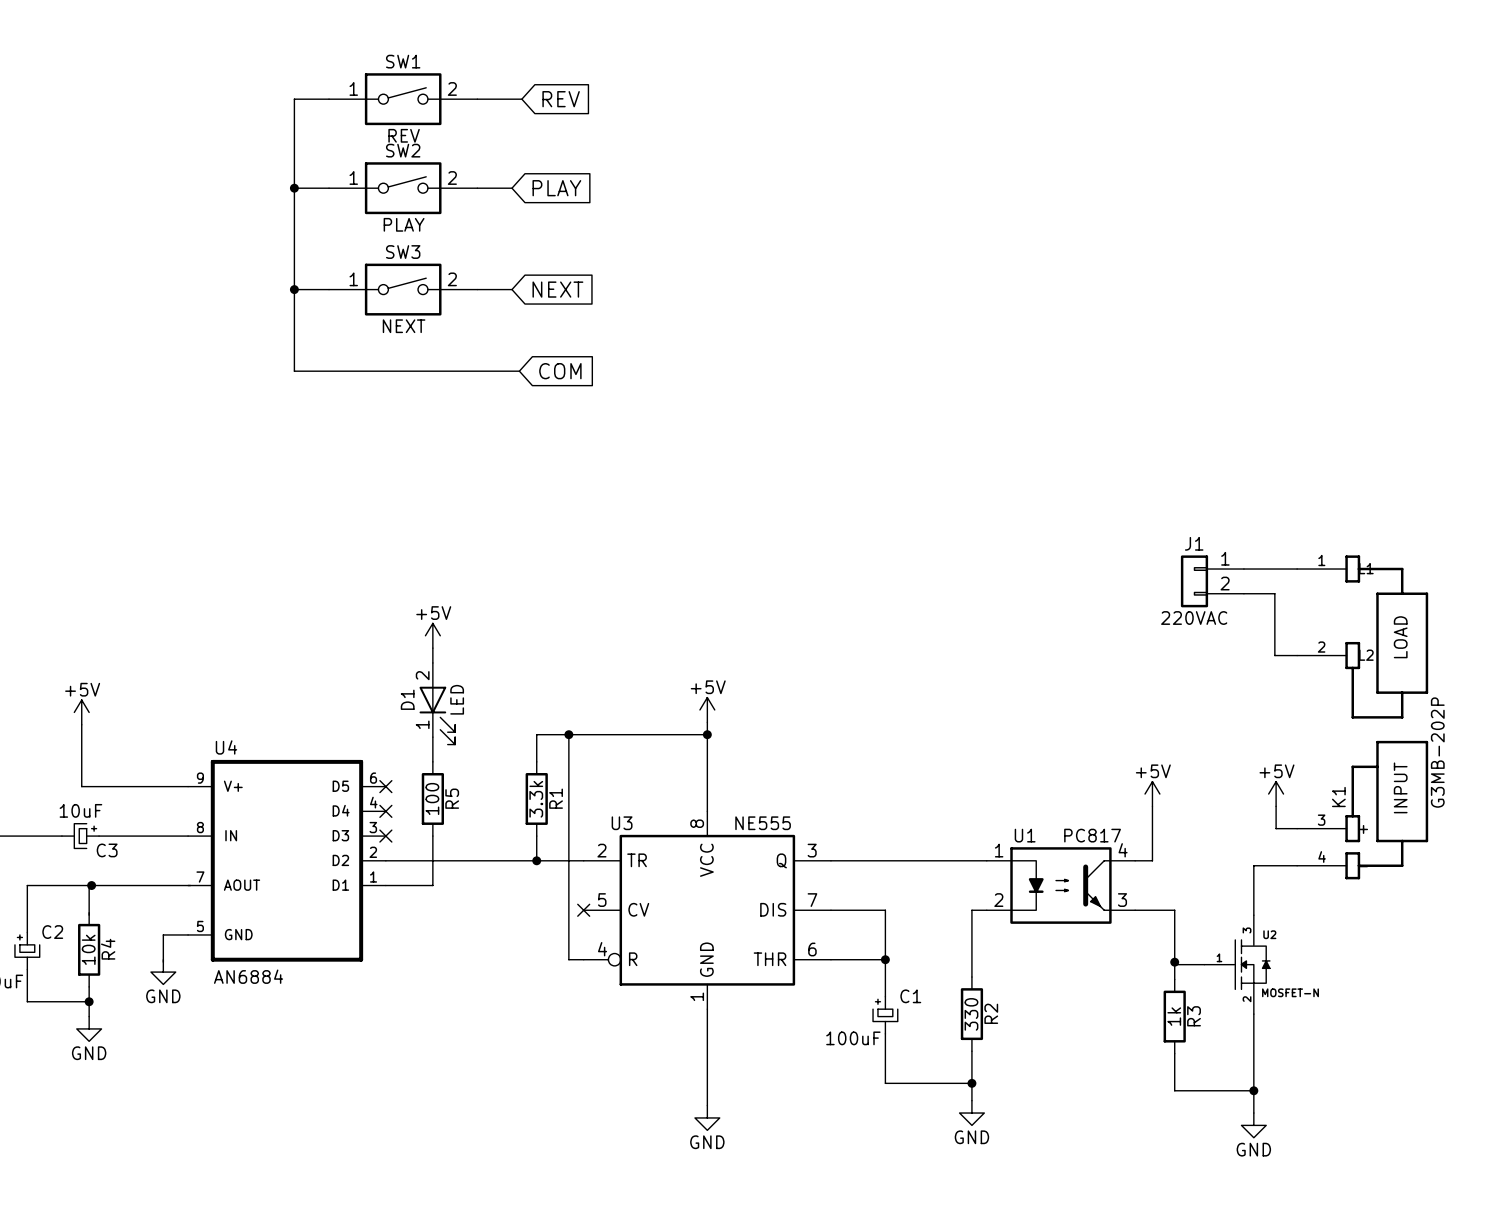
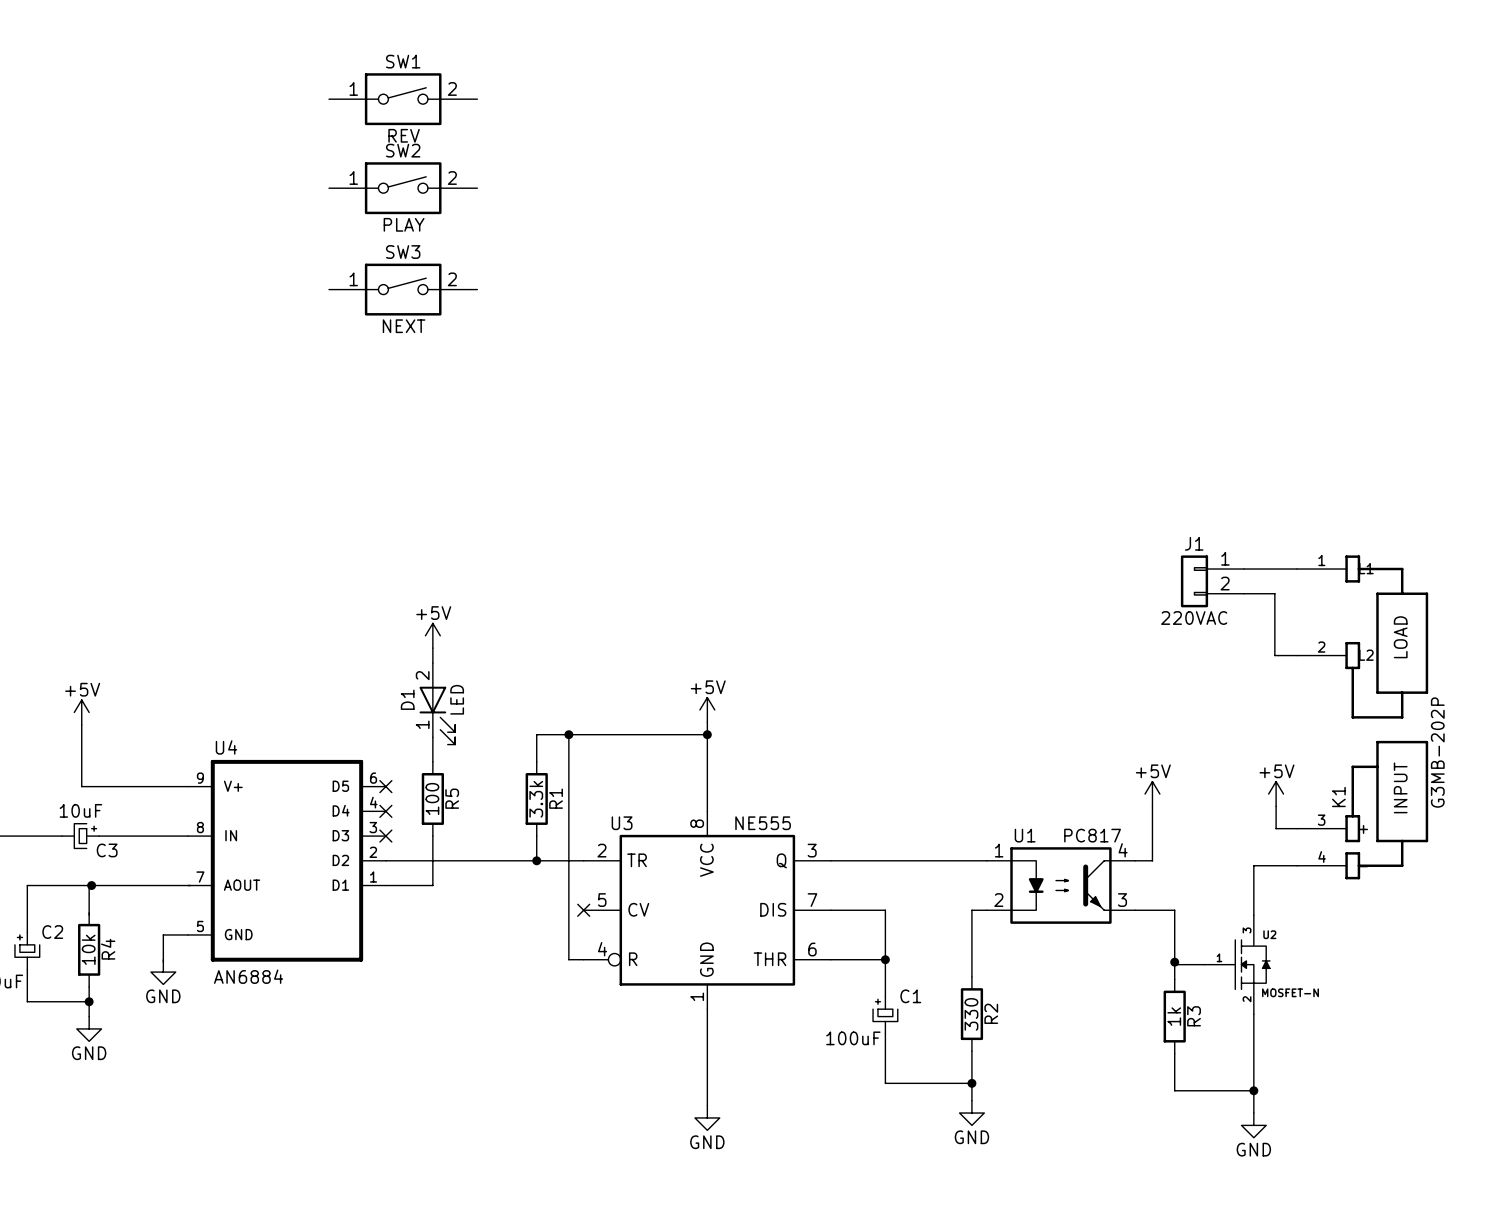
wire: (329, 99) (294, 99) (294, 371) (519, 371) -> none
wire: (477, 99) (521, 99) -> none
global label: REV (561, 99) -> none
wire: (294, 188) (329, 188) -> none
junction: (294, 188) -> none
wire: (477, 188) (512, 188) -> none
global label: PLAY (556, 188) -> none
wire: (294, 289) (329, 289) -> none
junction: (294, 289) -> none
wire: (477, 289) (512, 289) -> none
global label: NEXT (557, 289) -> none
global label: COM (560, 371) -> none

